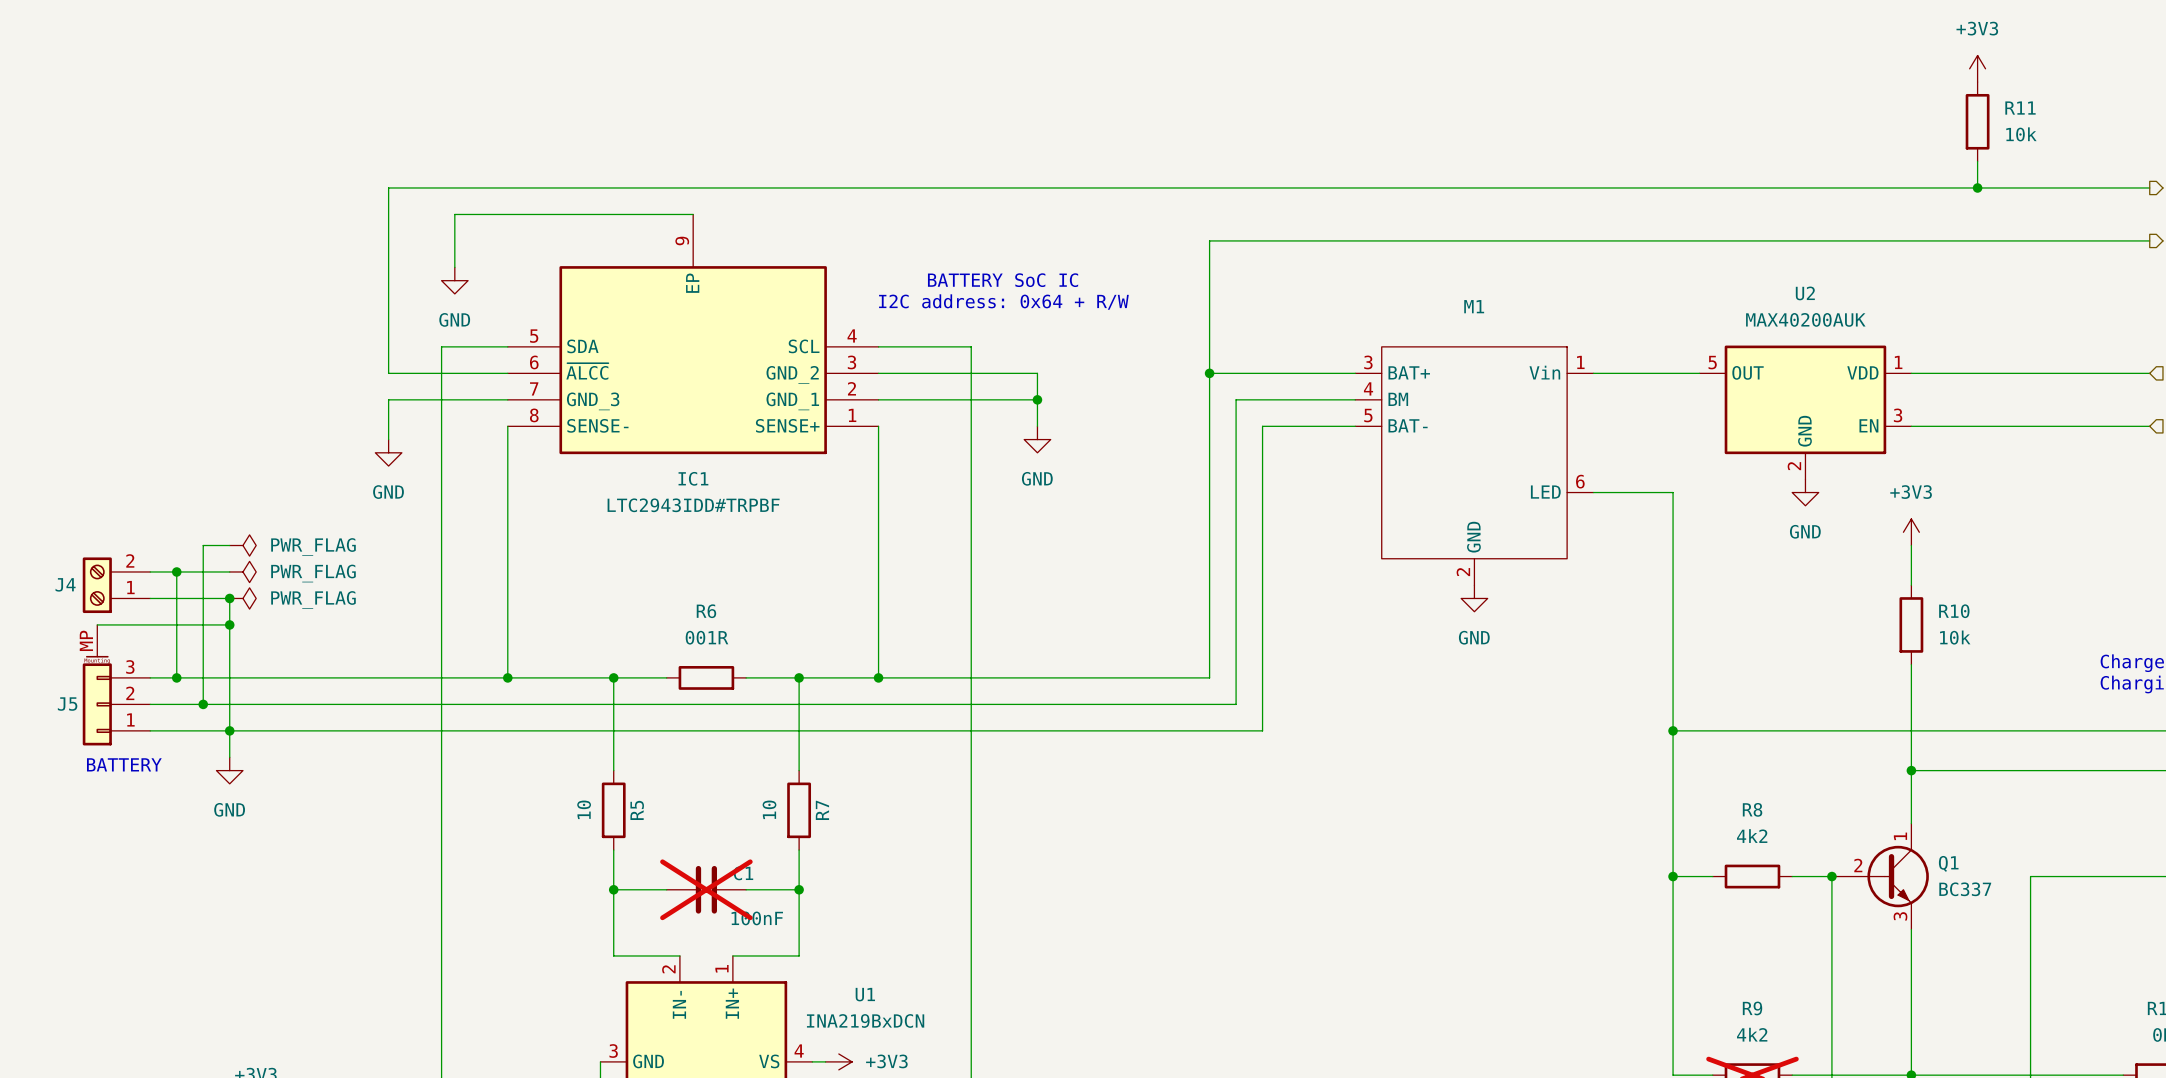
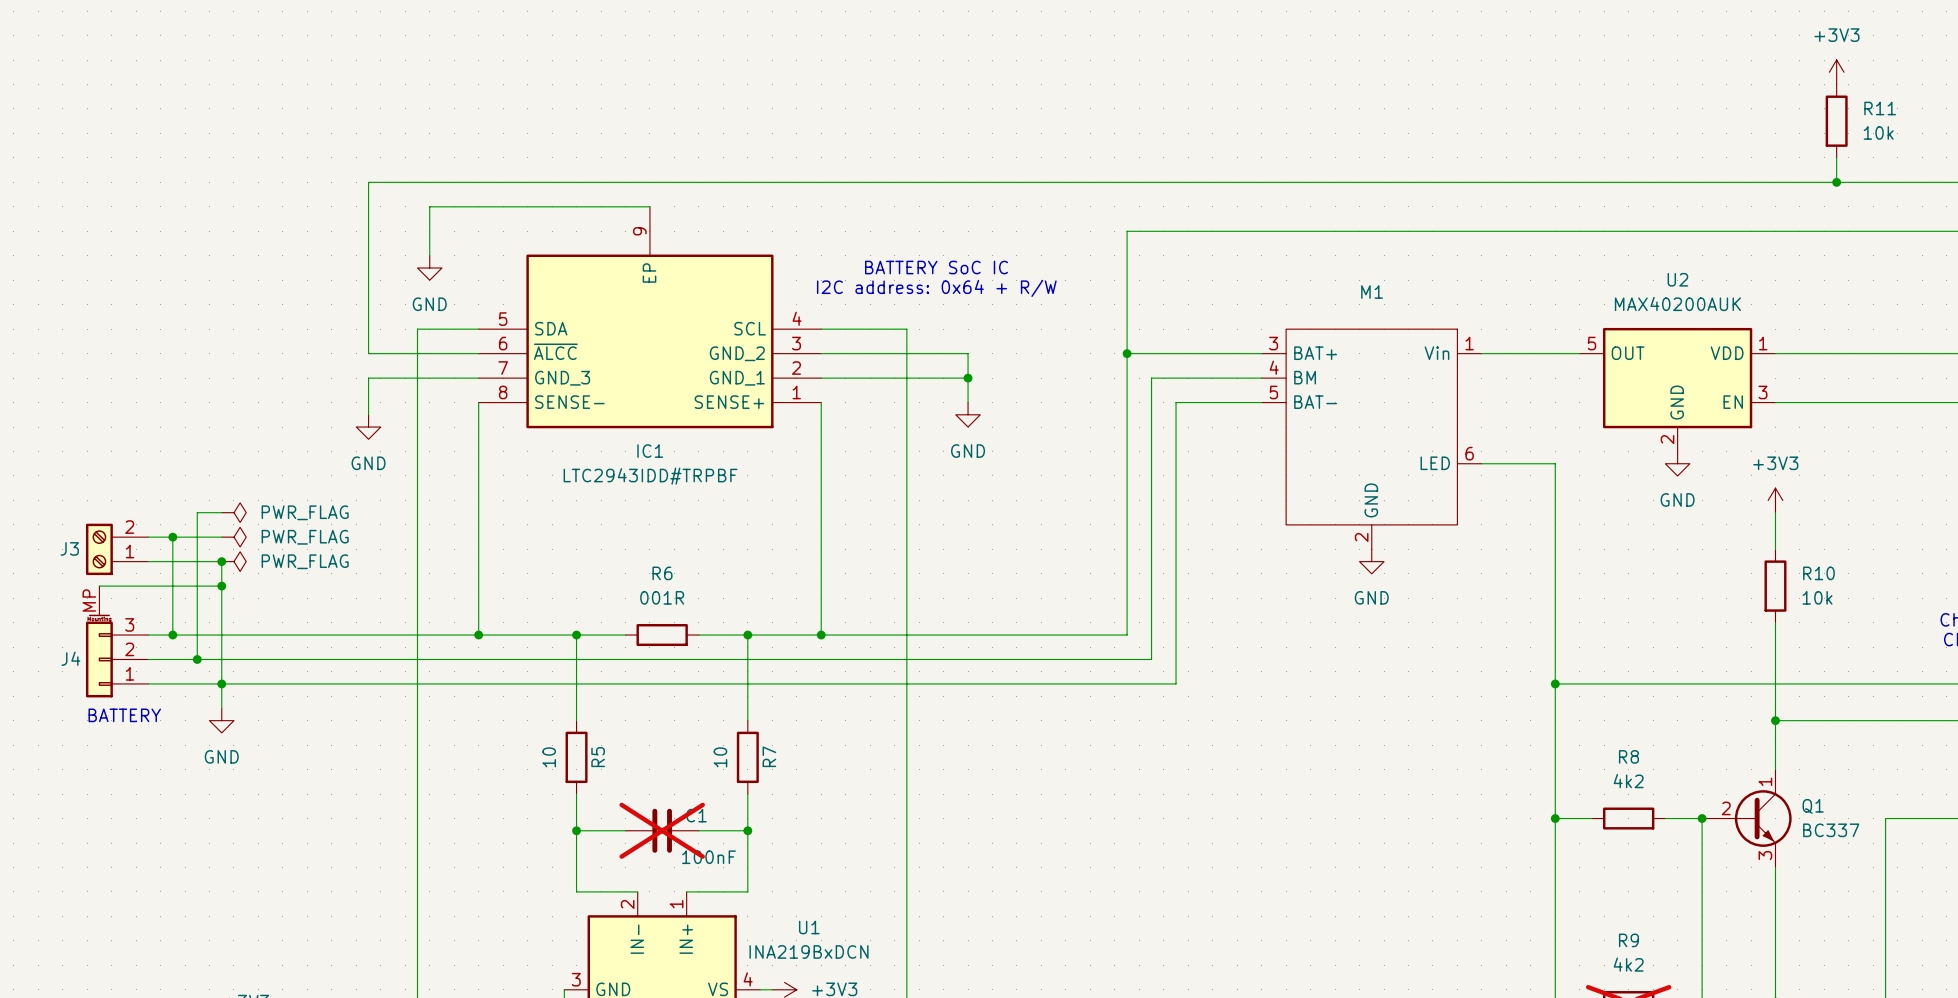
J4 name: J4 (65, 584) -> J3 (69, 548)
J5 name: J5 (67, 704) -> J4 (70, 658)

